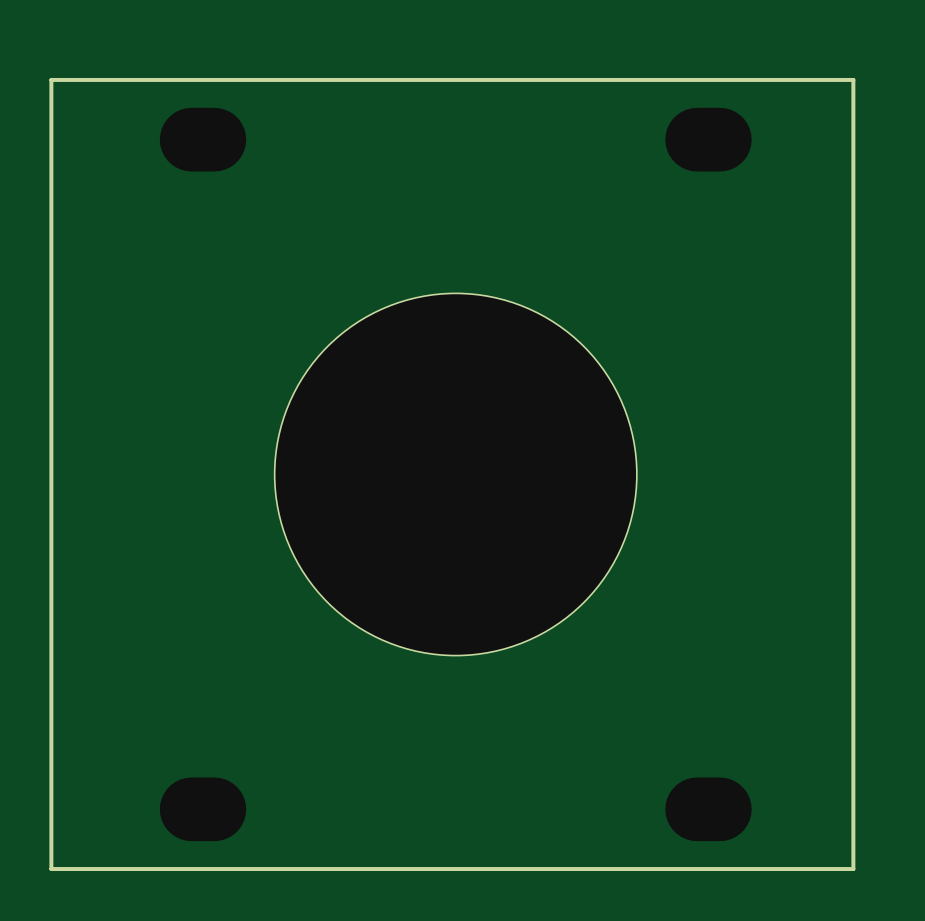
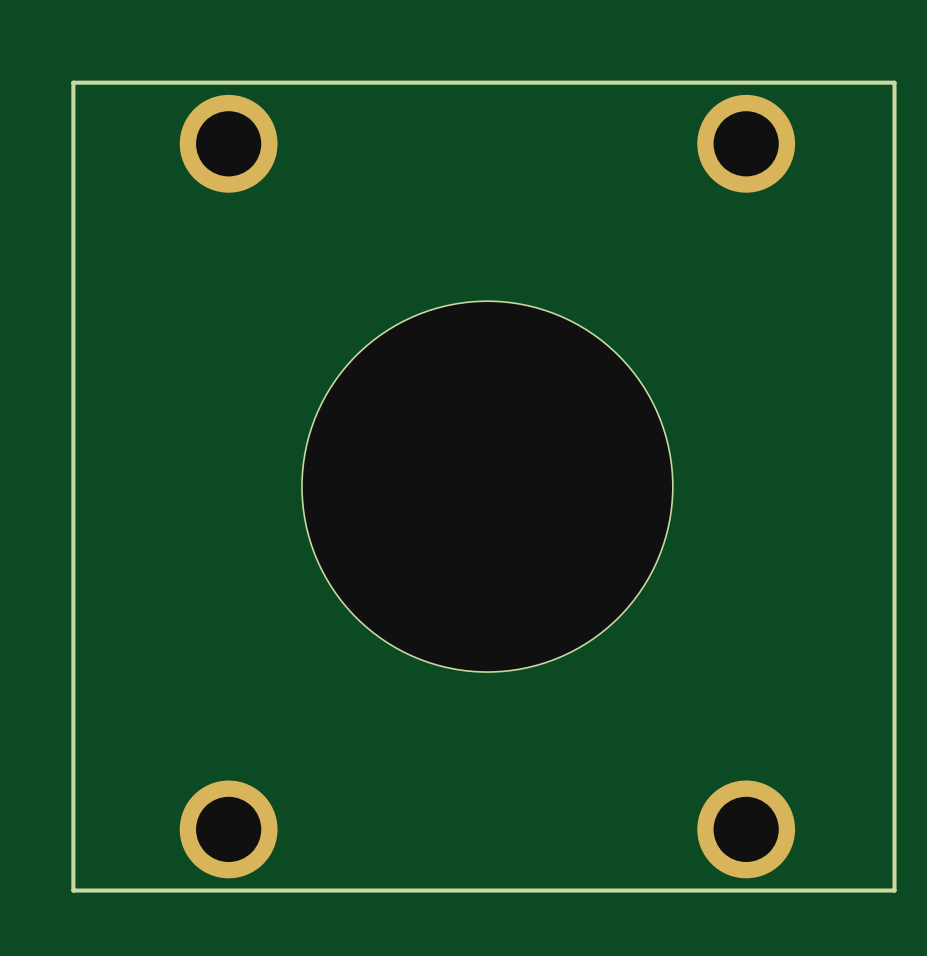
part footprint: [159, 107, 247, 172] -> [179, 94, 278, 193]
part footprint: [665, 107, 752, 172] -> [697, 94, 796, 193]
part footprint: [159, 777, 247, 842] -> [179, 780, 278, 879]
part footprint: [665, 777, 752, 842] -> [697, 780, 796, 879]

